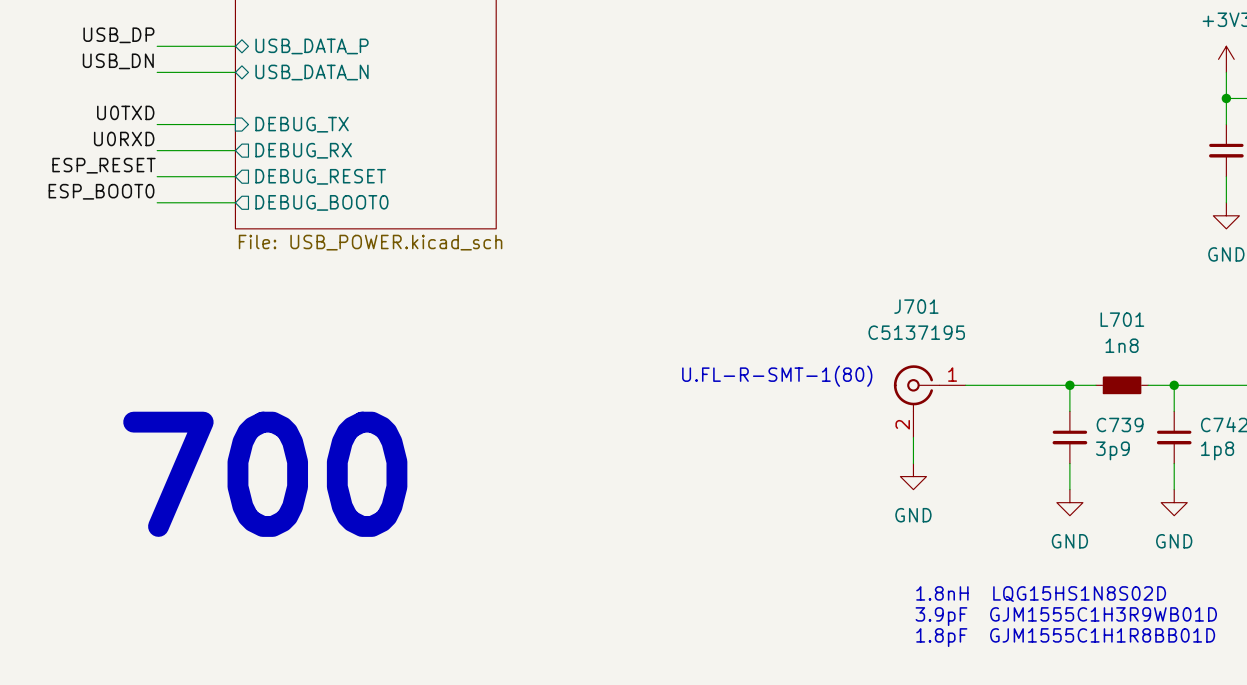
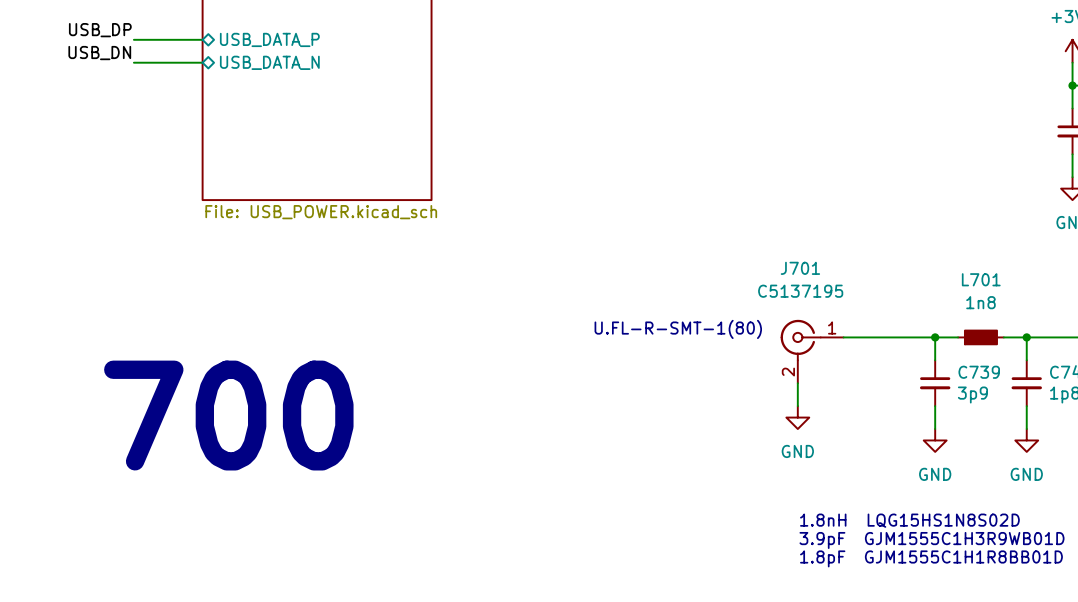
label: U0TXD (125, 112) -> none
wire: (157, 124) (235, 124) -> none
sheet pin: DEBUG_TX (302, 124) -> none
label: U0RXD (124, 138) -> none
wire: (157, 150) (235, 150) -> none
sheet pin: DEBUG_RX (303, 150) -> none
label: ESP_RESET (104, 165) -> none
wire: (157, 176) (235, 176) -> none
sheet pin: DEBUG_RESET (320, 176) -> none
label: ESP_BOOT0 (101, 191) -> none
wire: (157, 202) (235, 202) -> none
sheet pin: DEBUG_BOOT0 (321, 202) -> none

